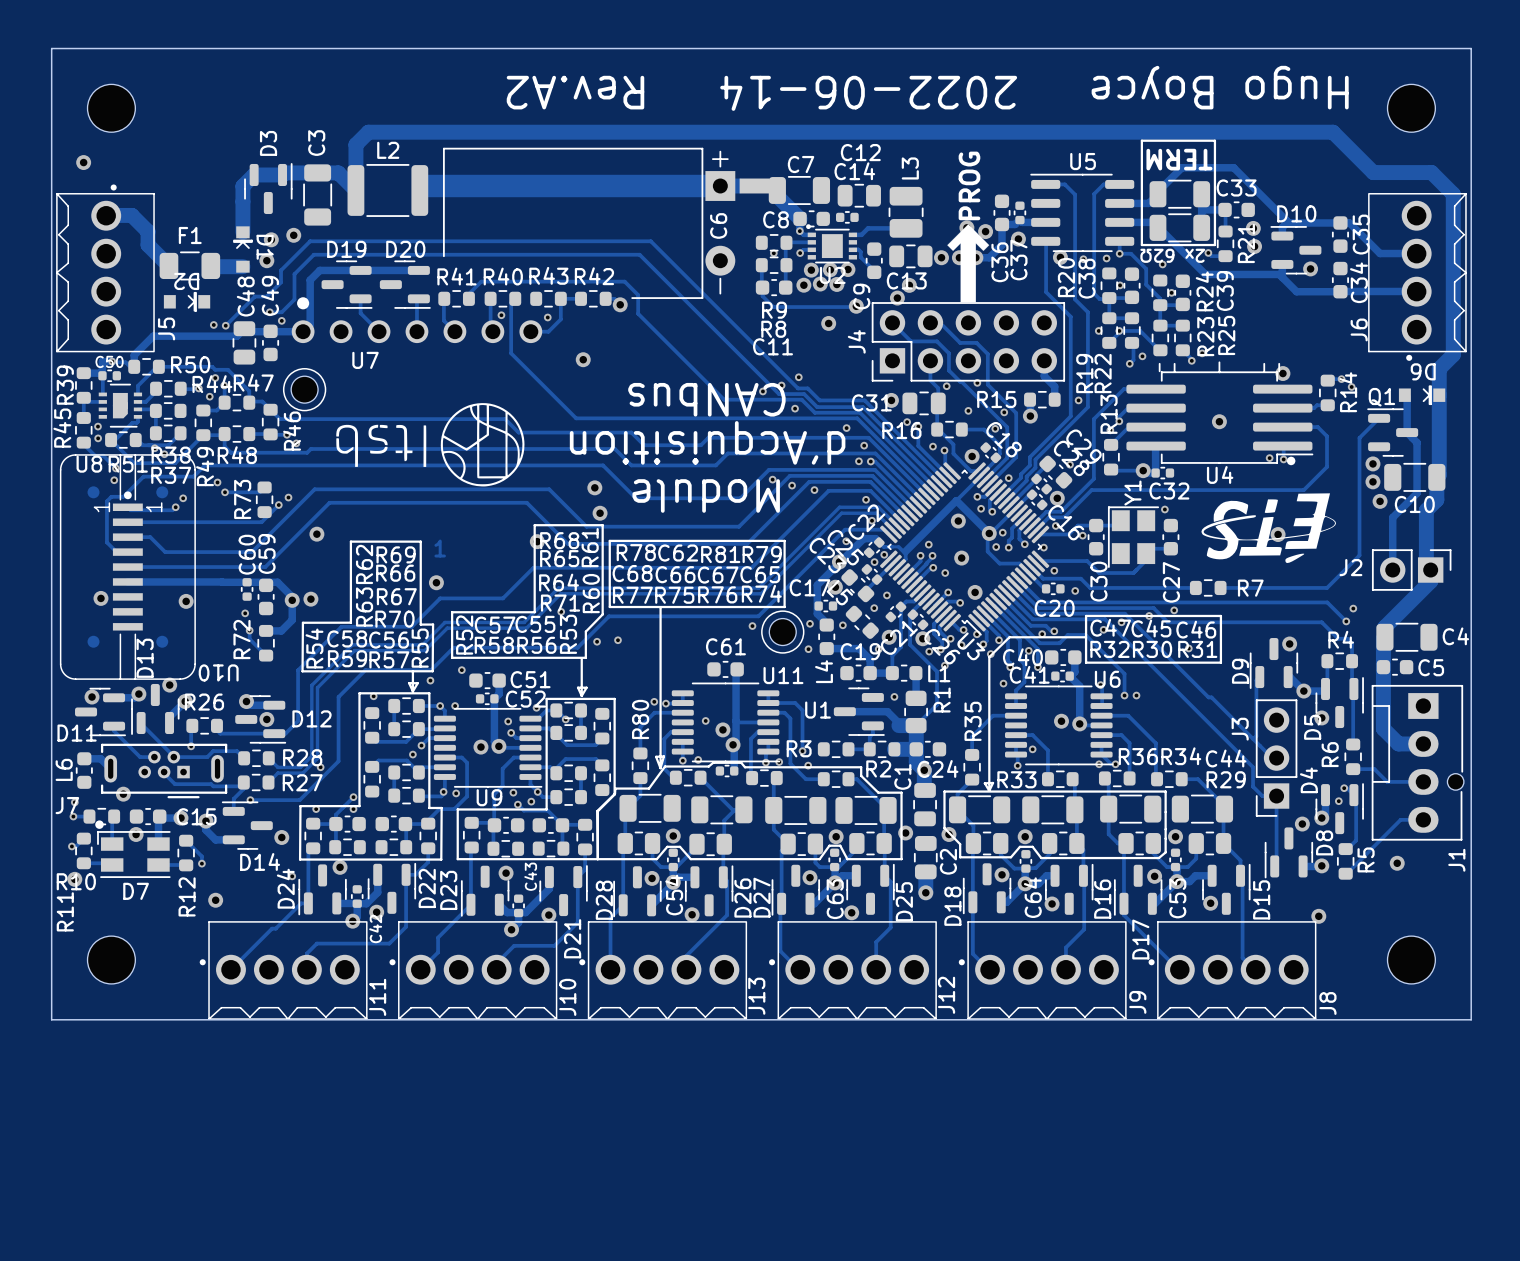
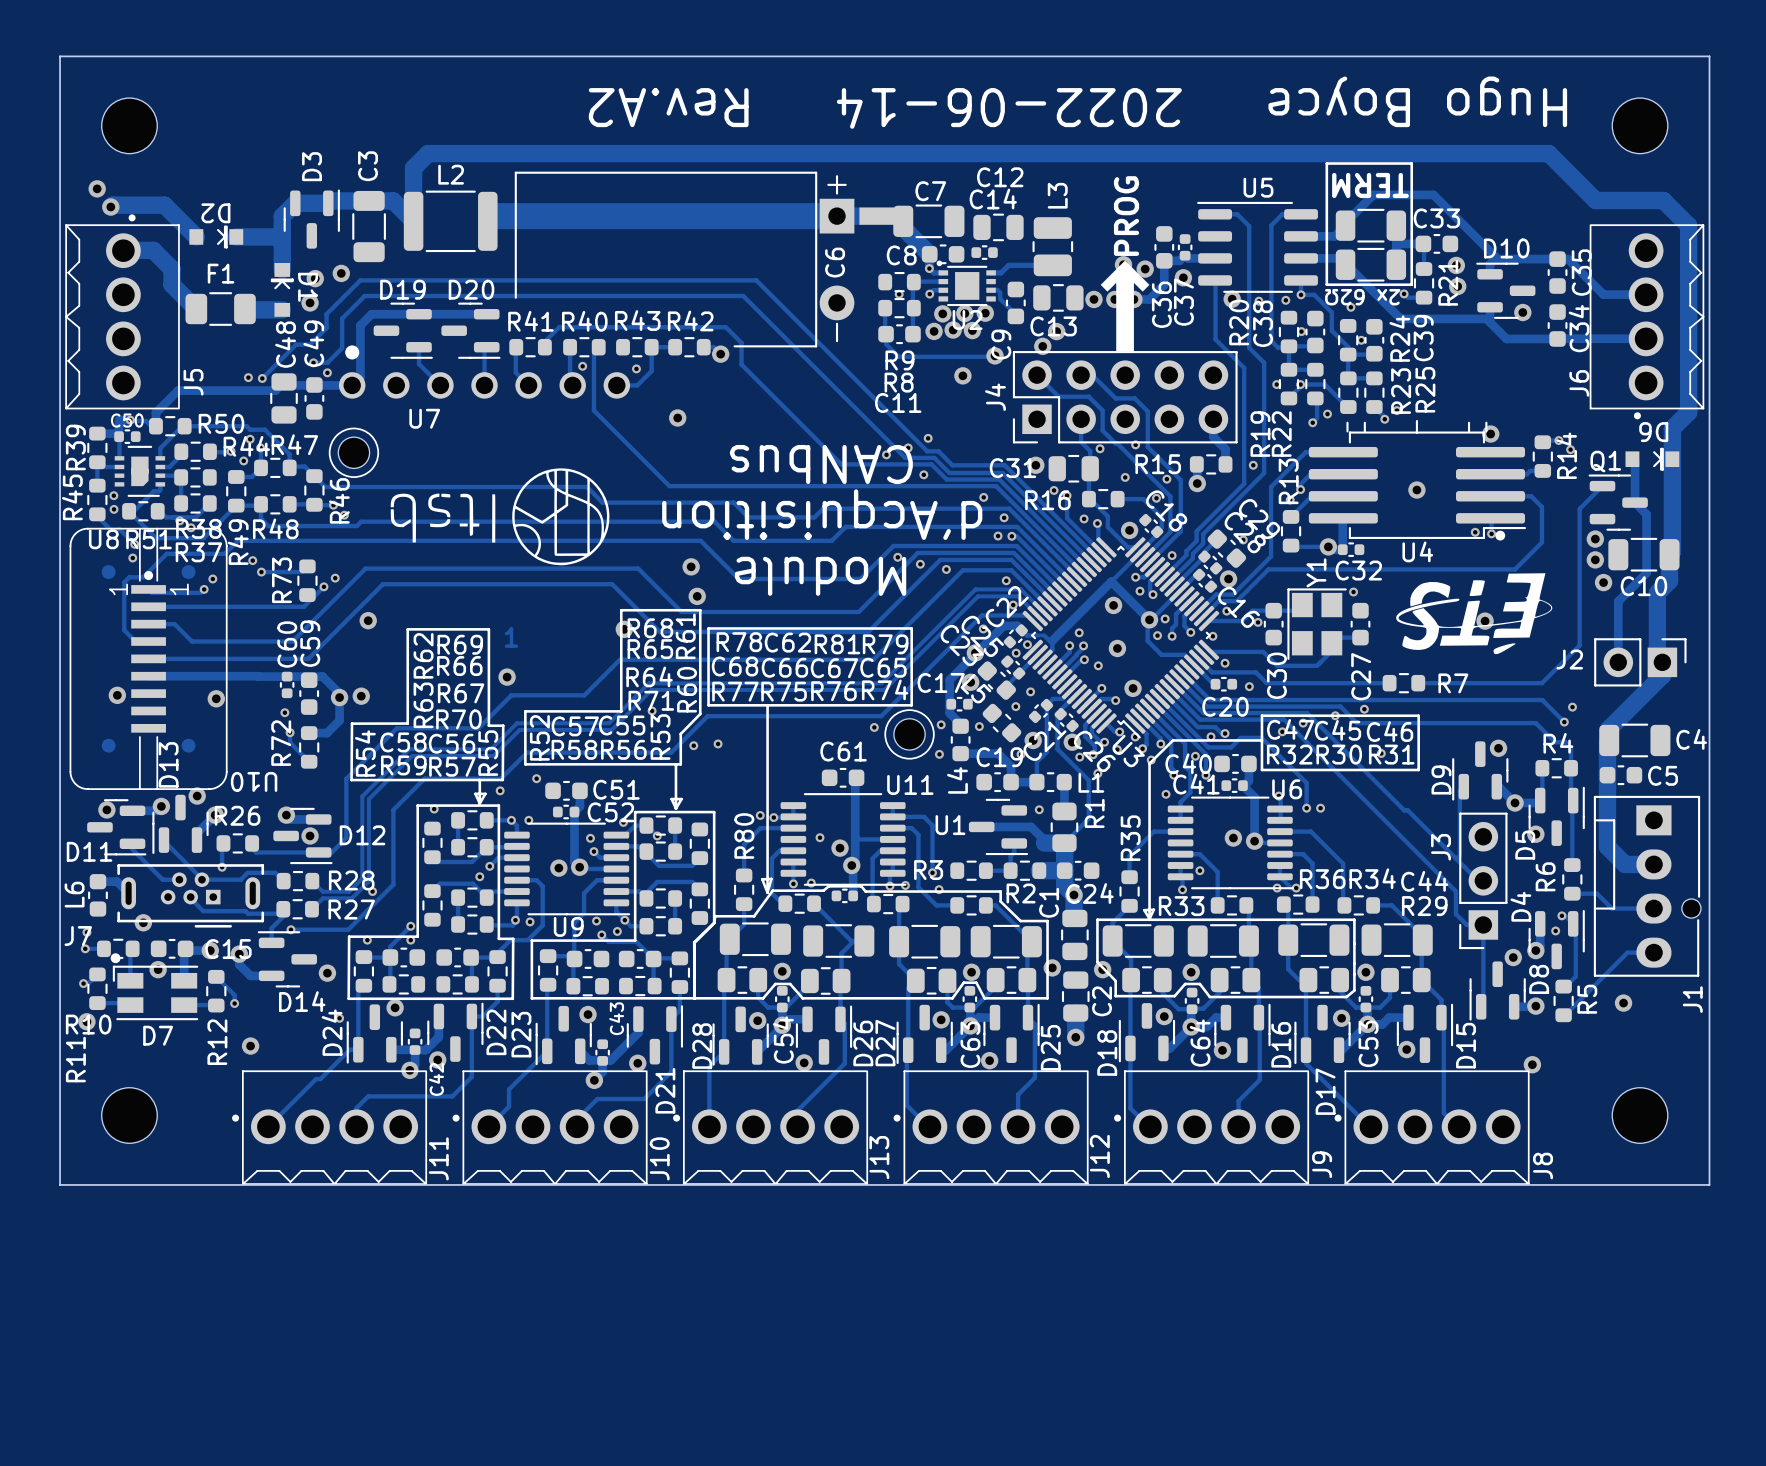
track: none -> (110, 207) (112, 205) (164, 205) (196, 236)
via: none -> (110, 207)
track: none -> (282, 234) (279, 236) (236, 236)
D2 position: (187, 301) -> (216, 236)

